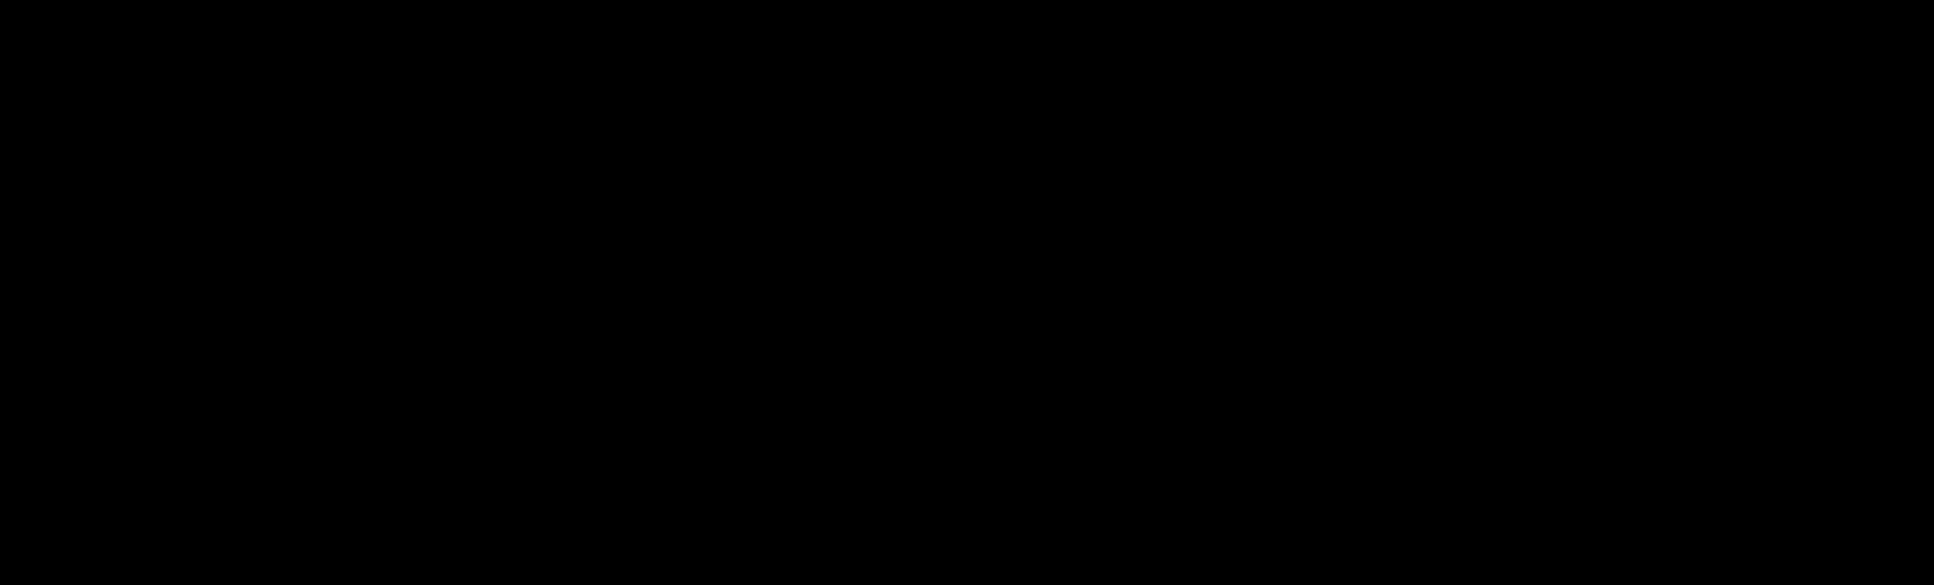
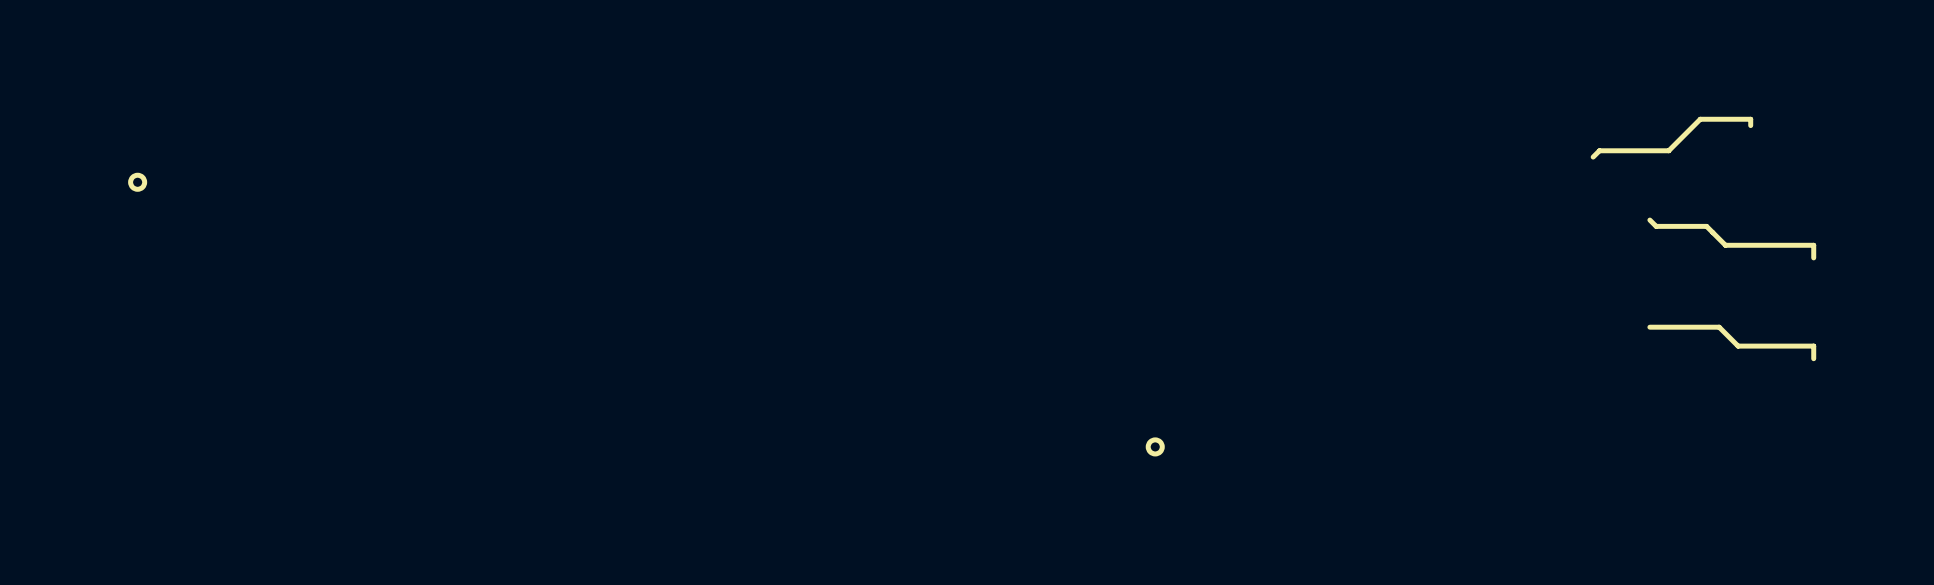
line: none -> (1750, 125) (1750, 119) (1700, 119) (1668, 150) (1599, 150) (1593, 157)
drawing: none -> [128, 172, 148, 192]
line: none -> (1649, 220) (1656, 226) (1706, 226) (1725, 245) (1813, 245) (1813, 257)
line: none -> (1649, 327) (1719, 327) (1738, 346) (1813, 346) (1813, 358)
drawing: none -> [1145, 437, 1165, 457]

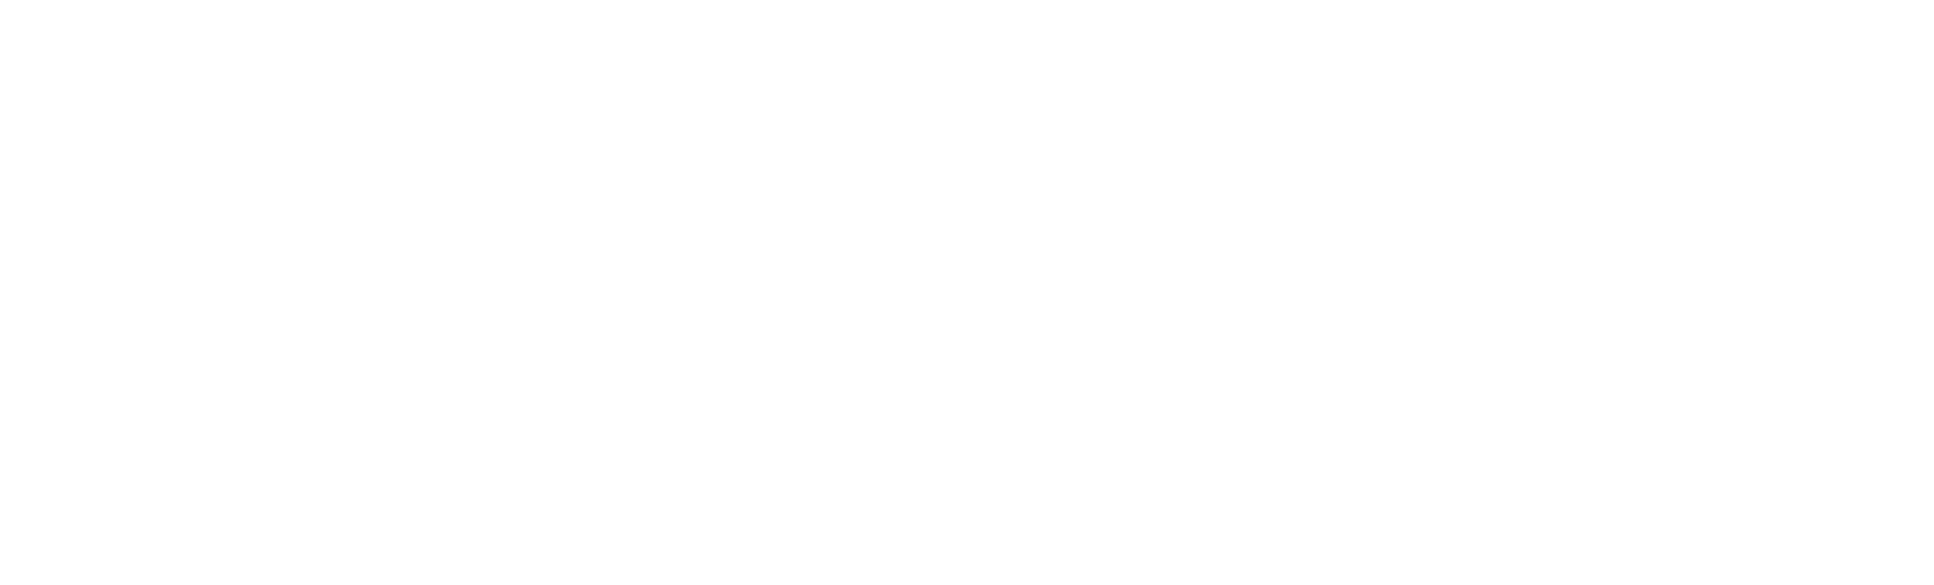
line: (1750, 125) (1750, 119) (1700, 119) (1668, 150) (1599, 150) (1593, 157) -> none
drawing: [128, 172, 148, 192] -> none
line: (1649, 220) (1656, 226) (1706, 226) (1725, 245) (1813, 245) (1813, 257) -> none
line: (1649, 327) (1719, 327) (1738, 346) (1813, 346) (1813, 358) -> none
drawing: [1145, 437, 1165, 457] -> none

